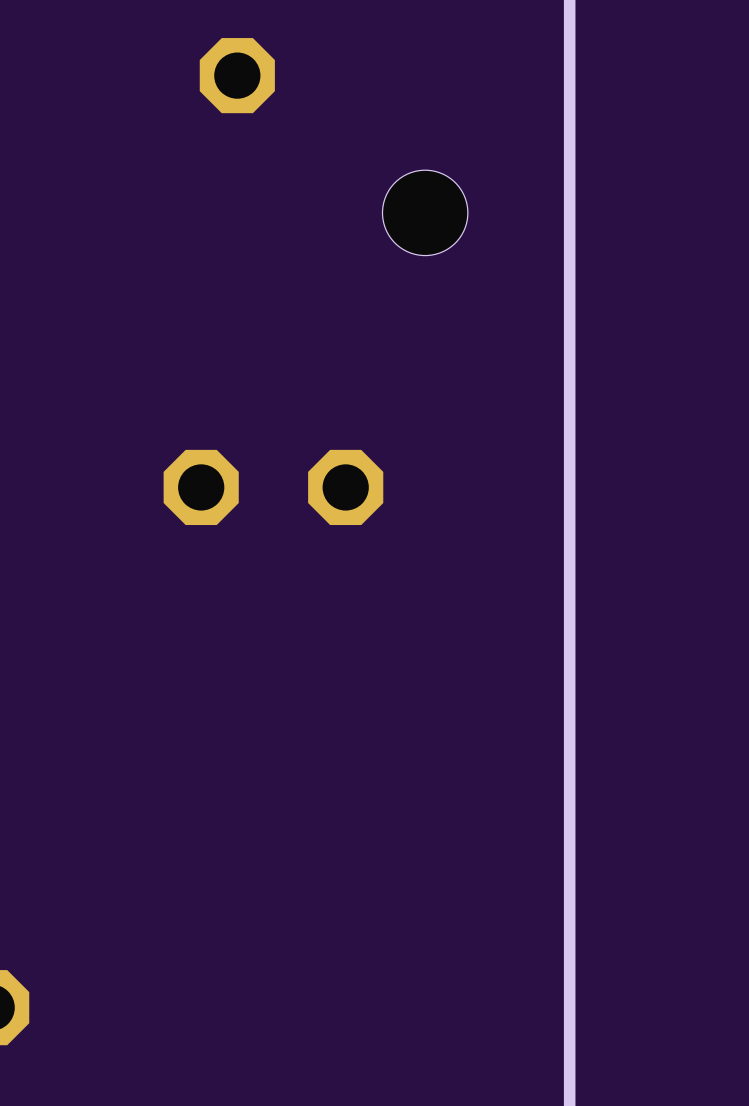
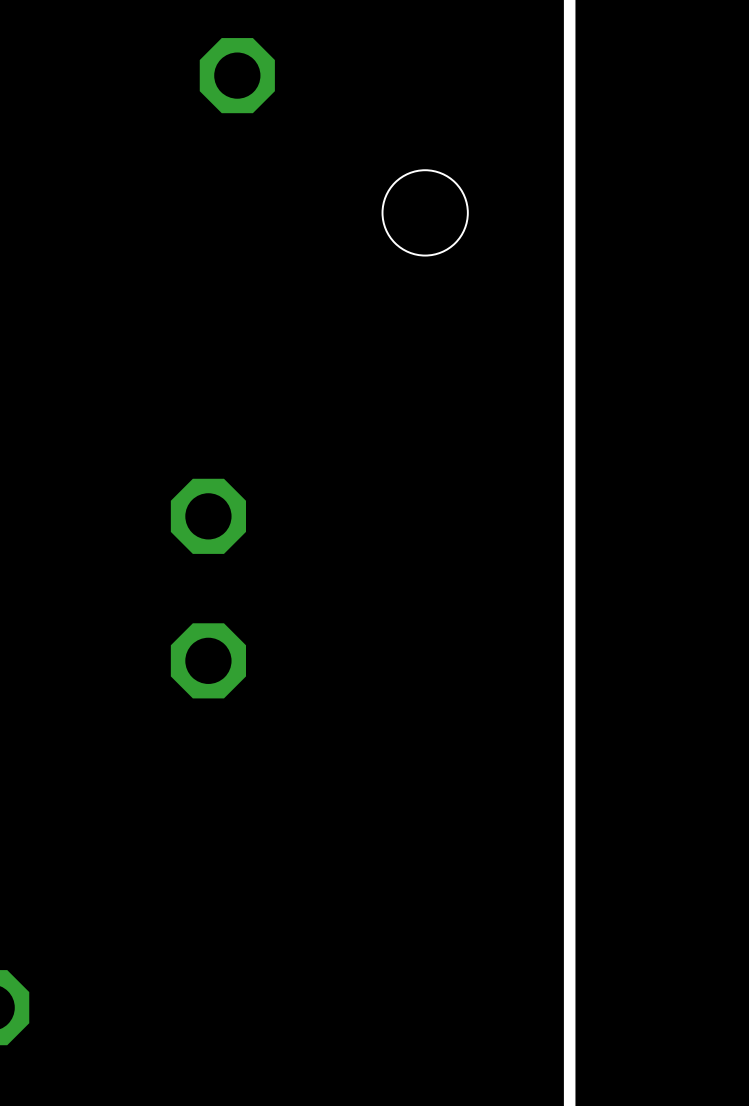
part rotation: 0° (273, 487) -> 90° clockwise (208, 588)

